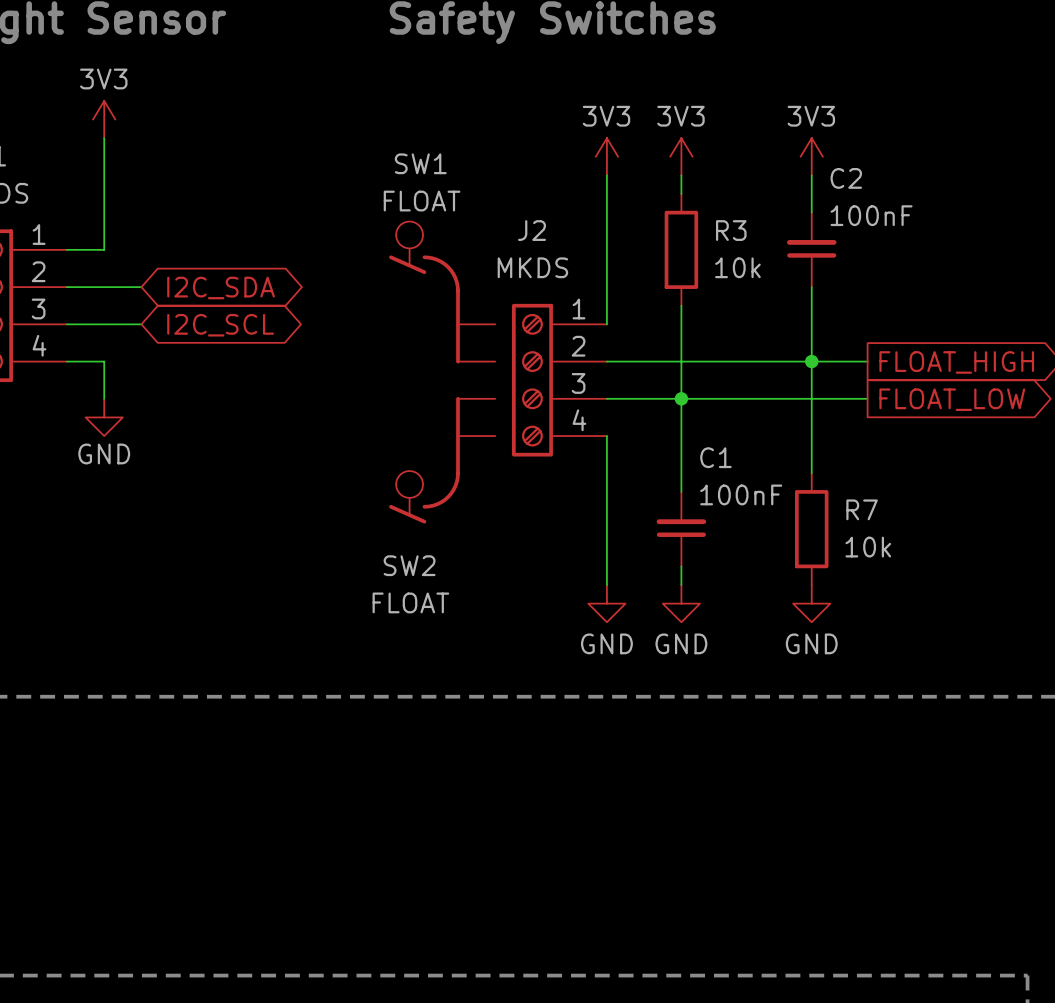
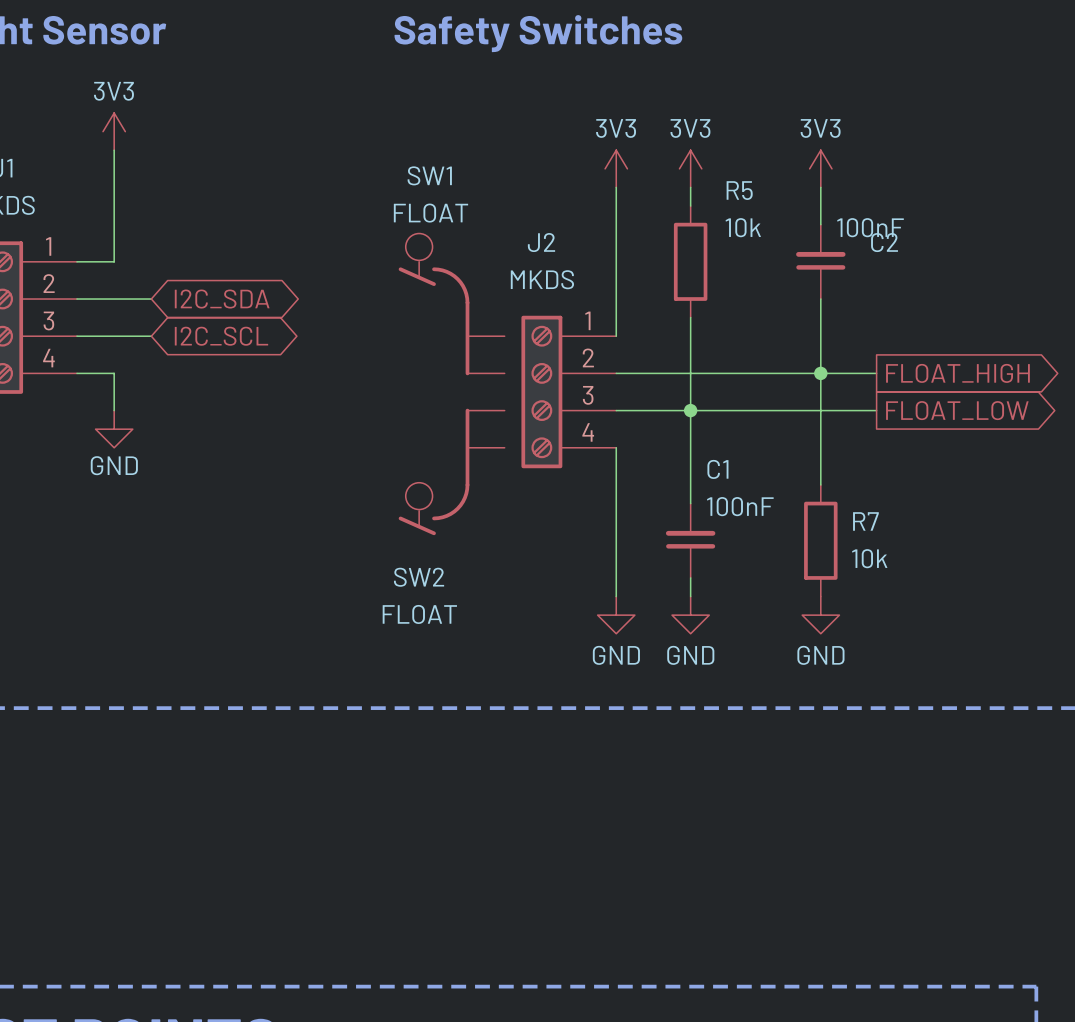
C2 name position: C2 (846, 178) -> C2 (884, 242)
R3 name: R3 (731, 230) -> R5 (739, 190)
R3 value position: 10k (737, 267) -> 10k (743, 227)

